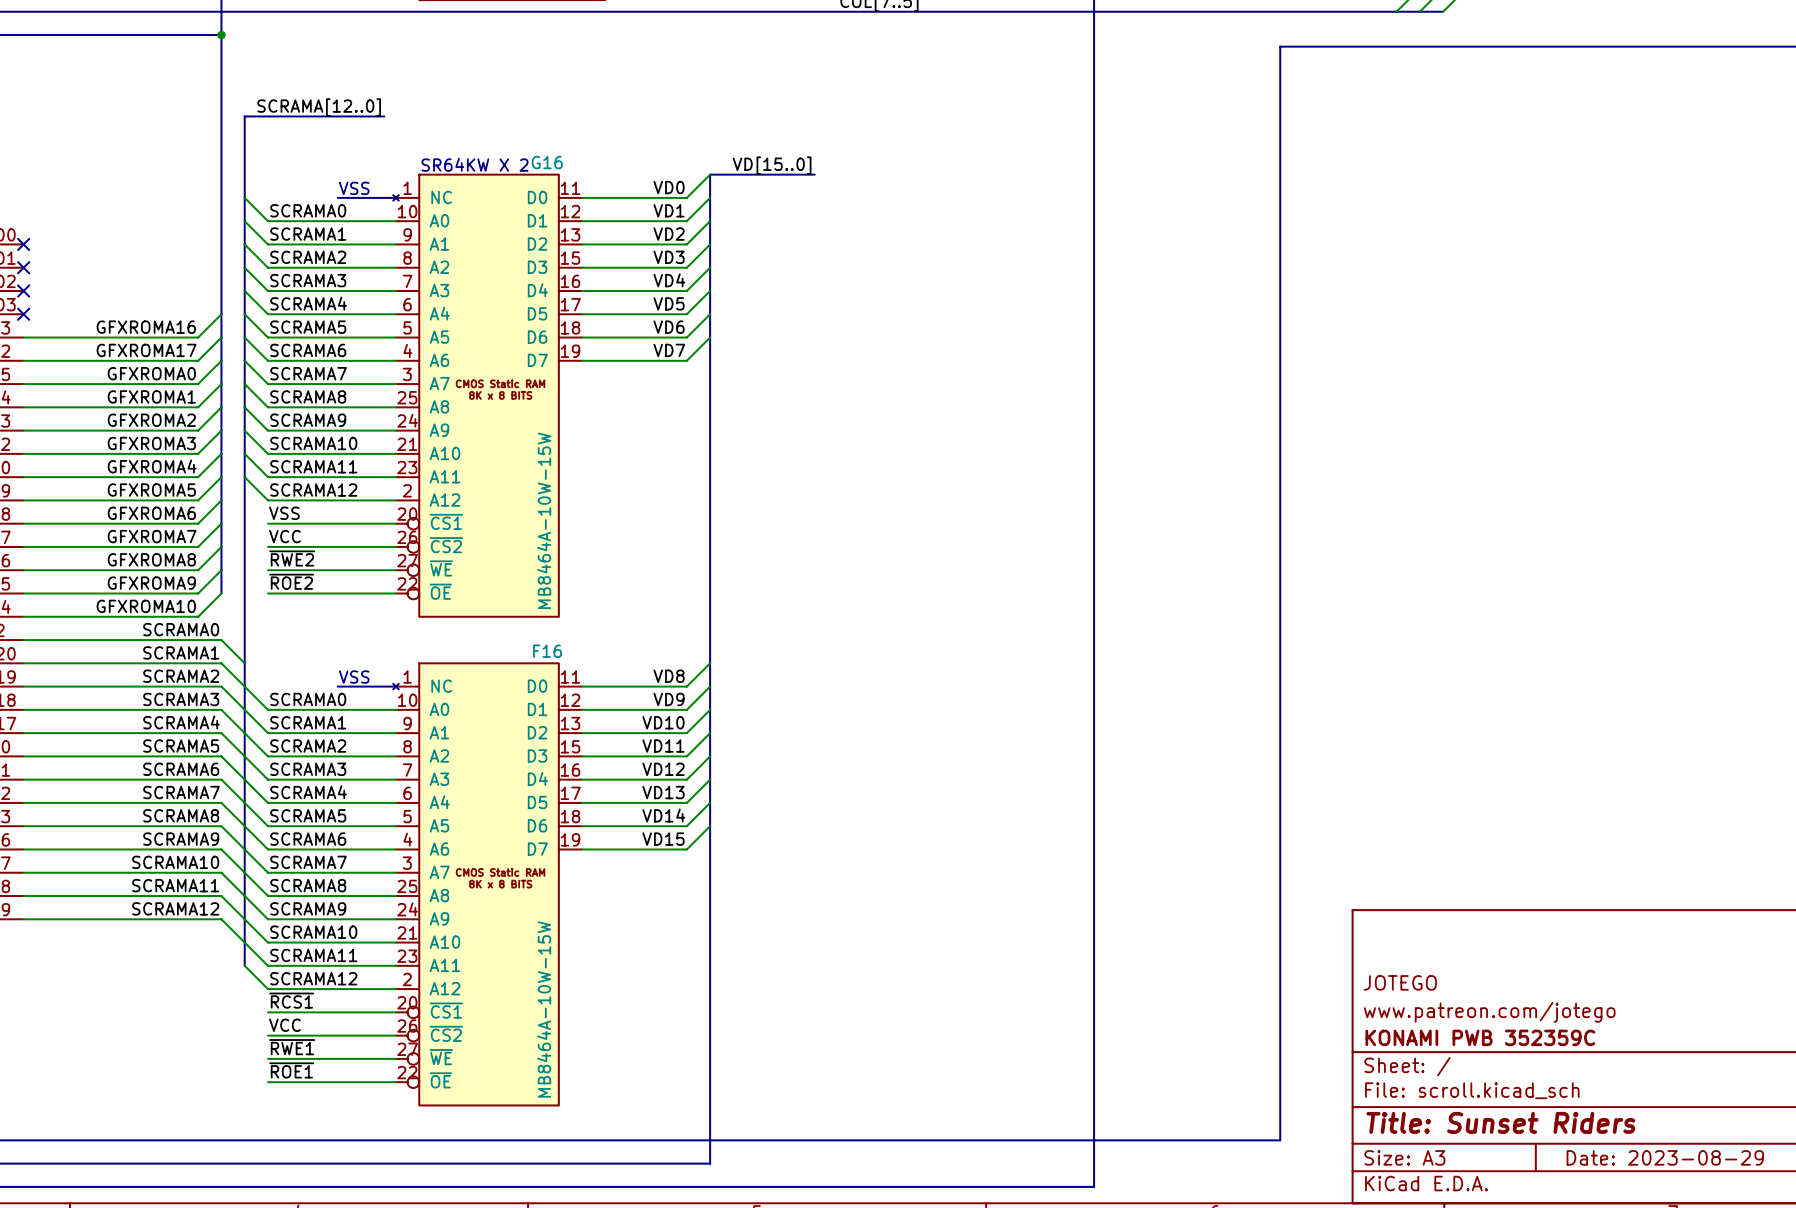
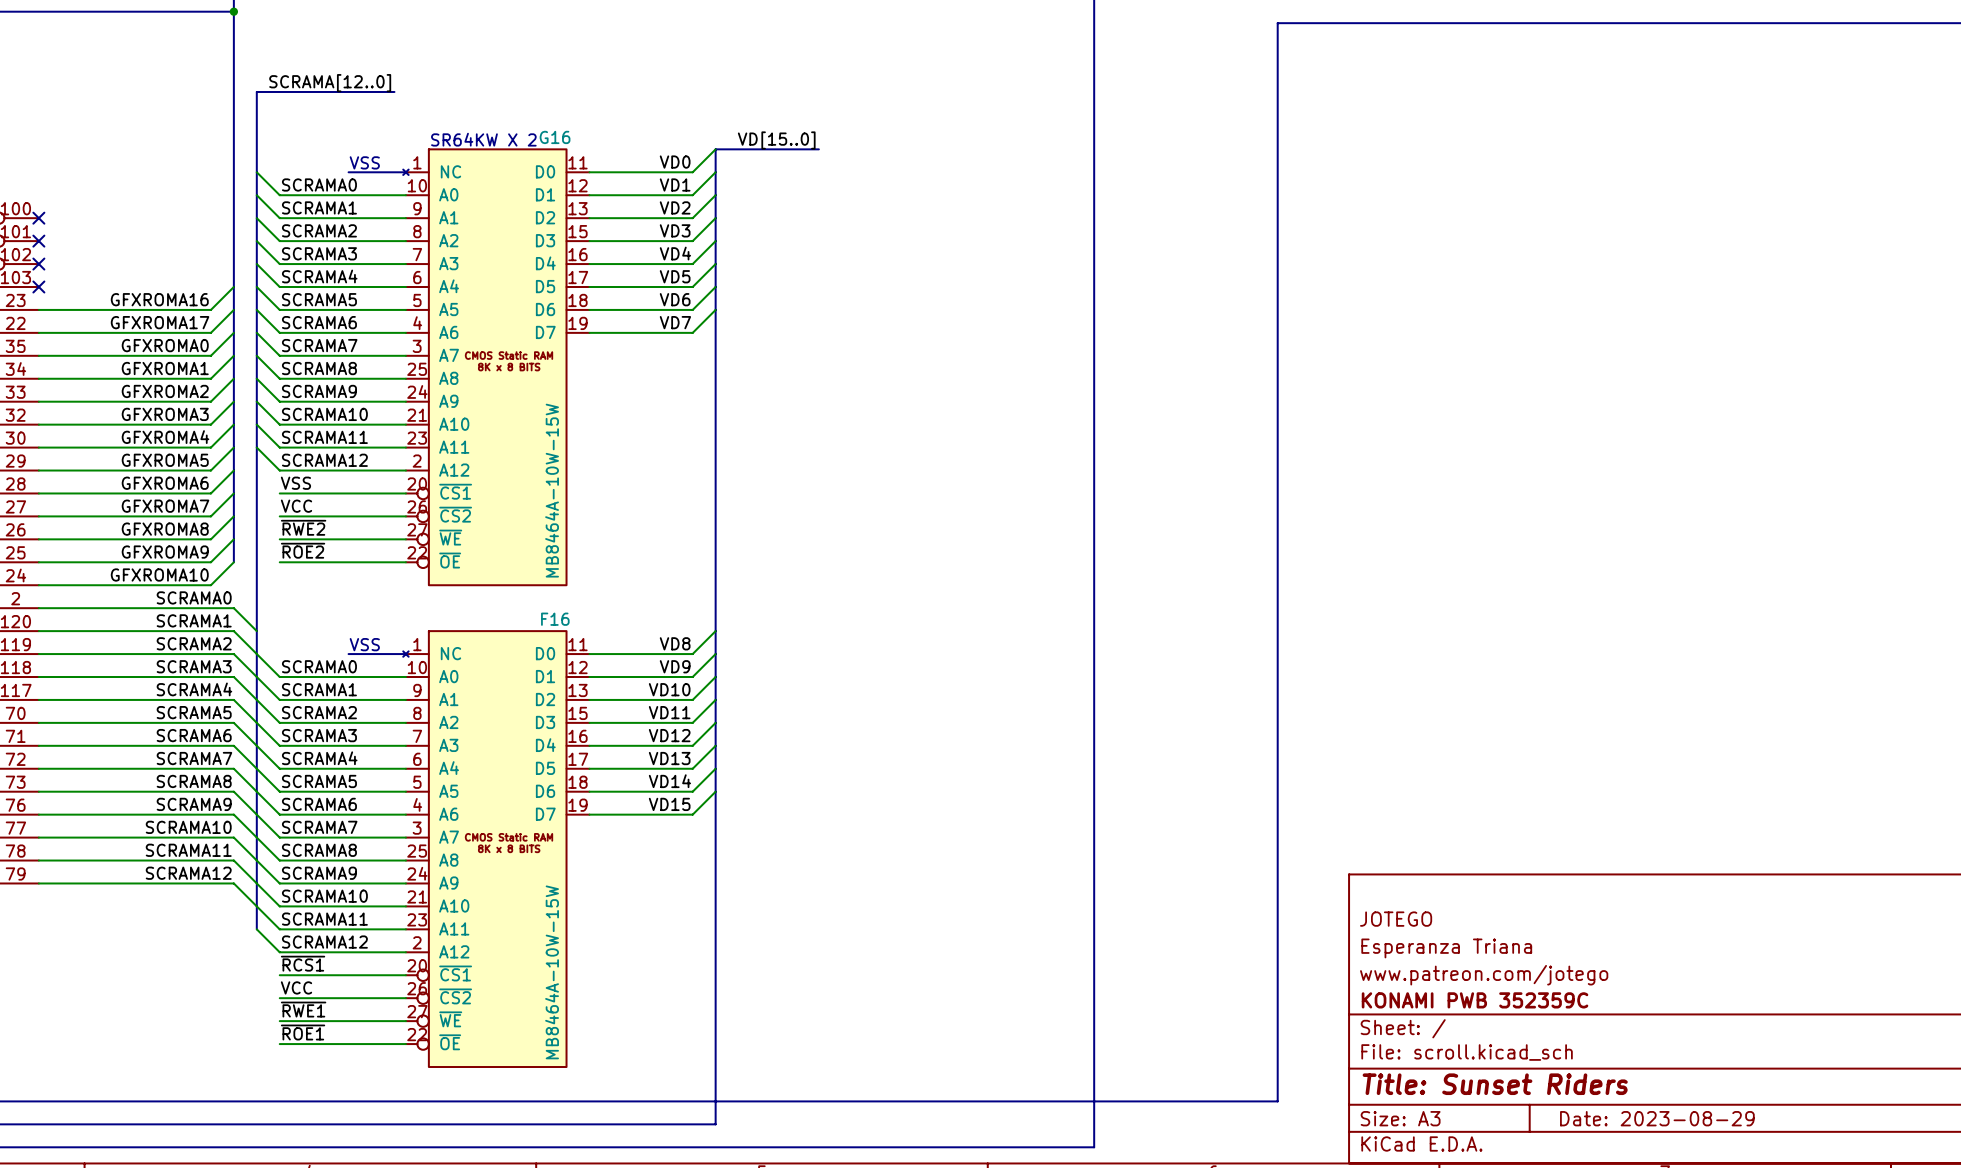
title block: none -> JOTEGO (1396, 919)
title block: JOTEGO (1400, 982) -> Esperanza Triana (1446, 948)

